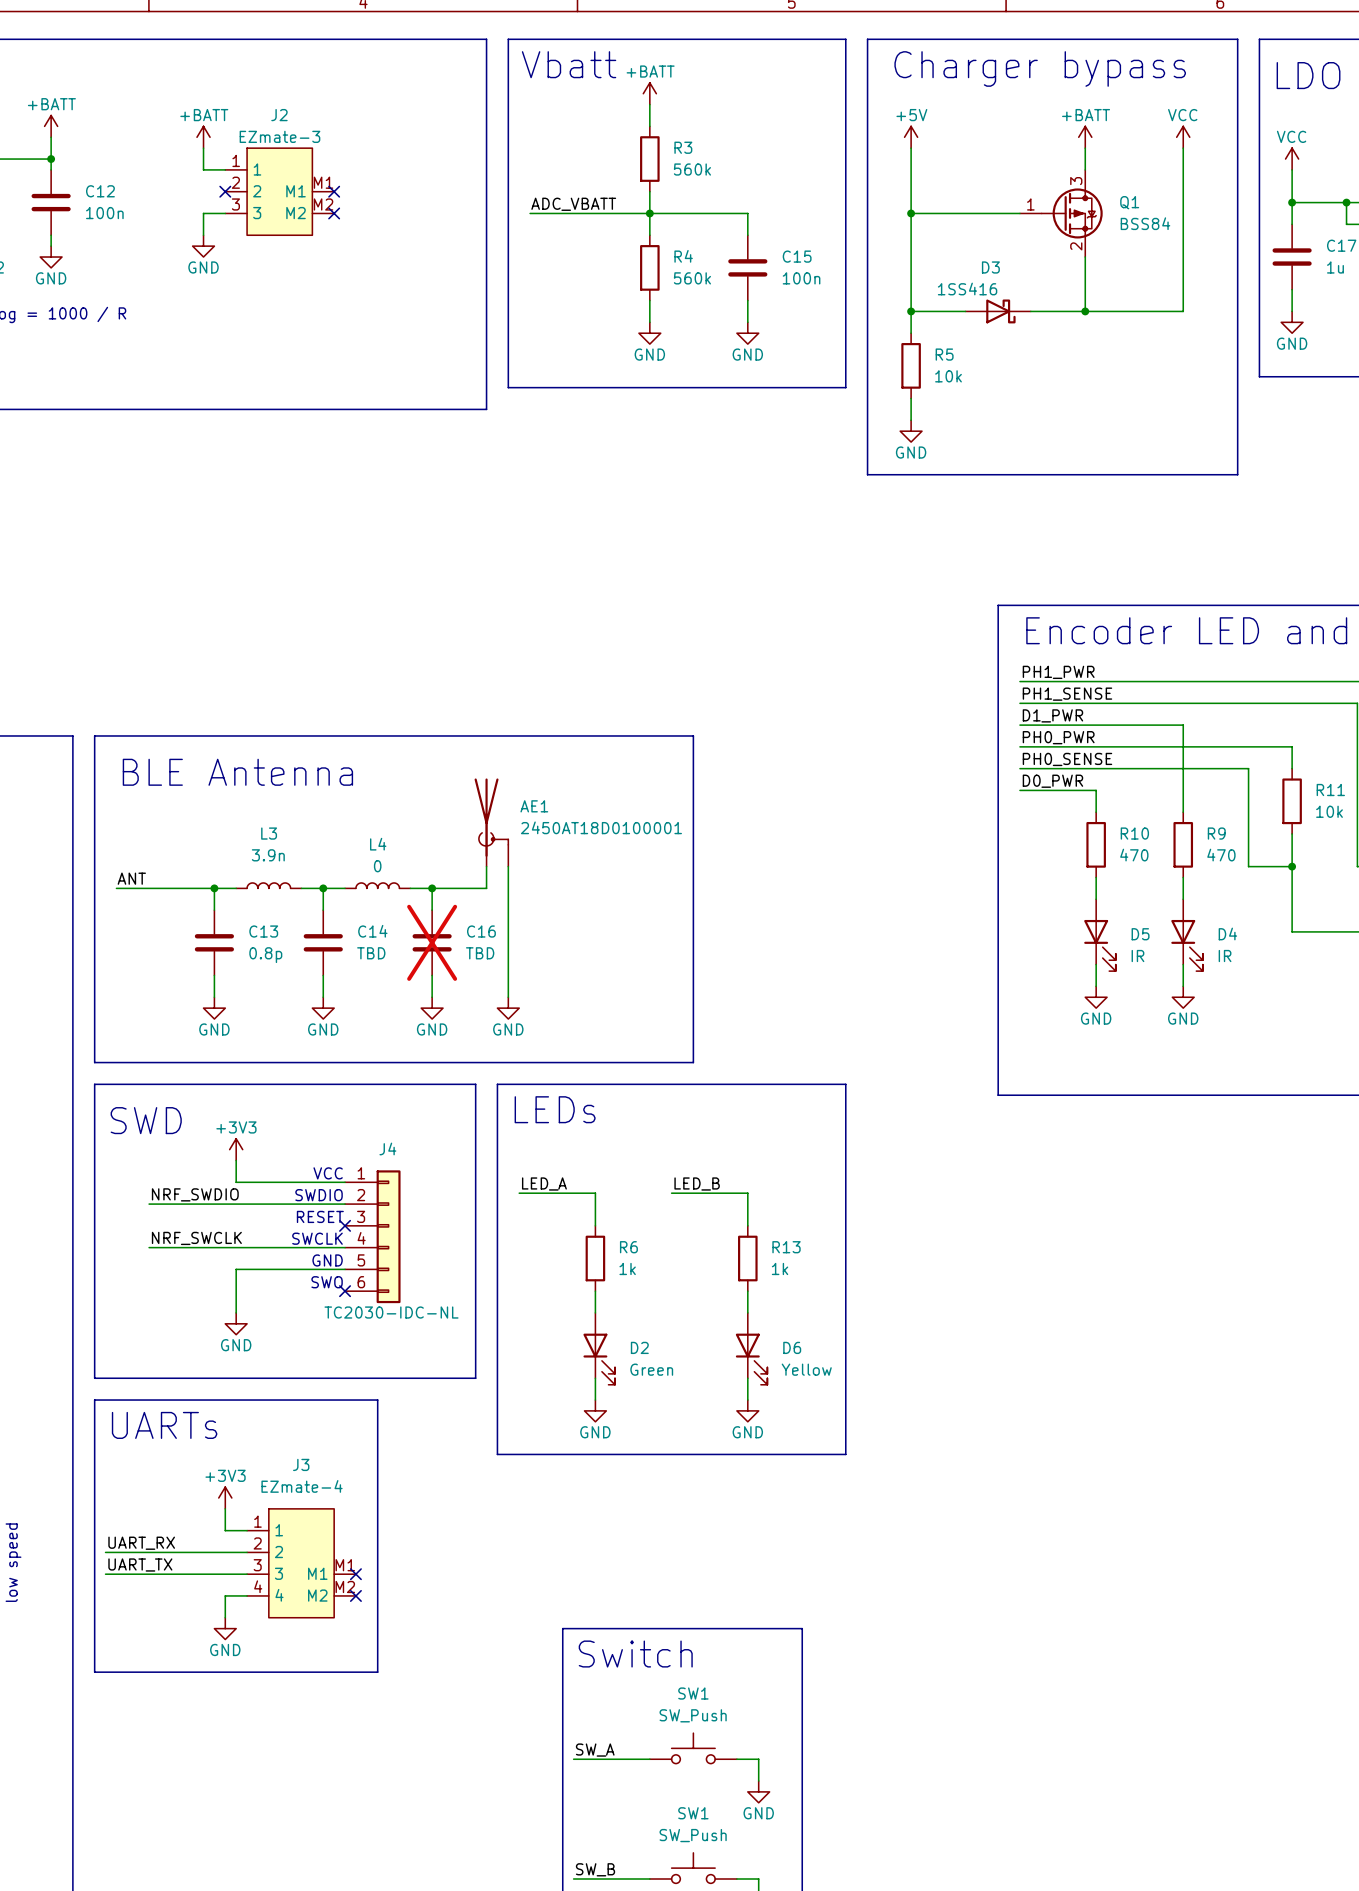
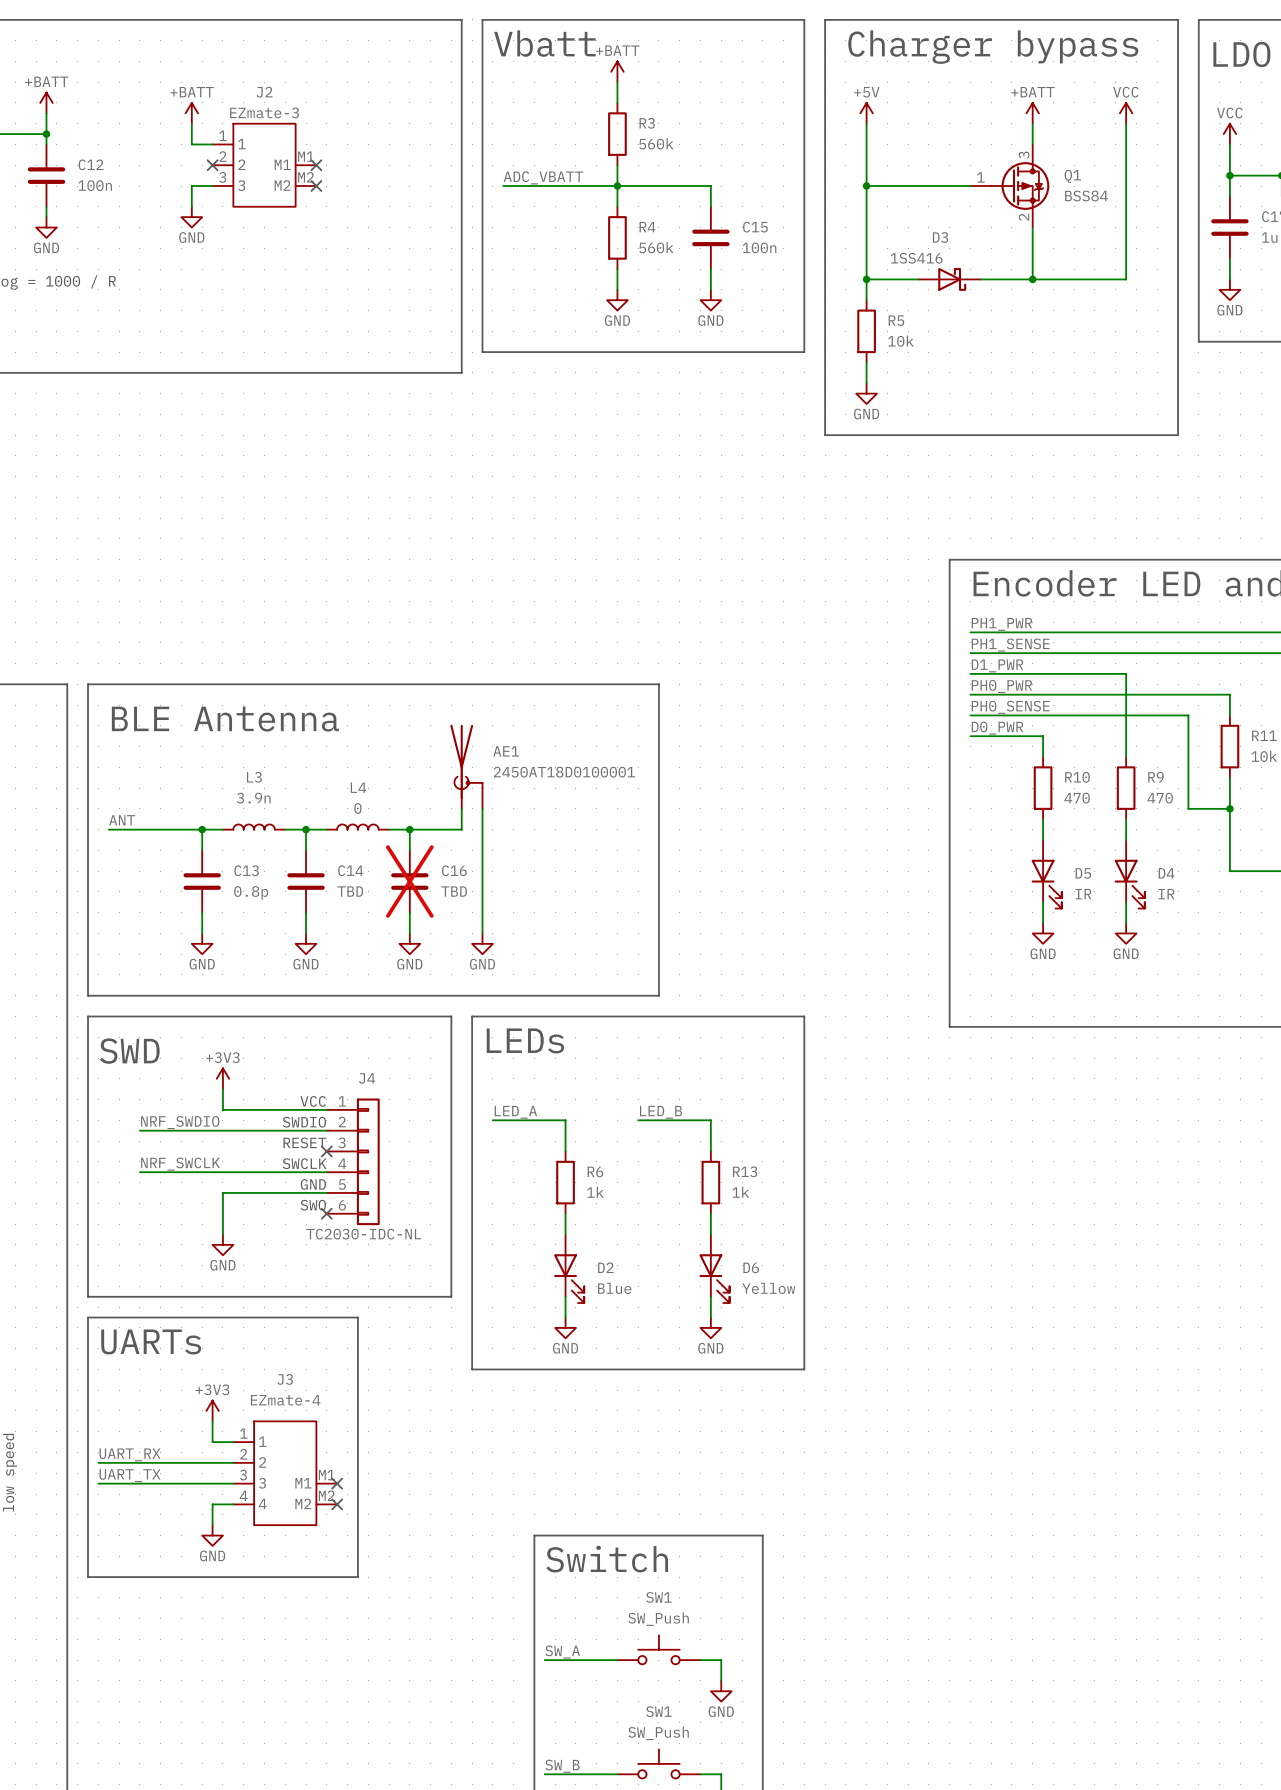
D2 value: Green (651, 1369) -> Blue (614, 1288)

